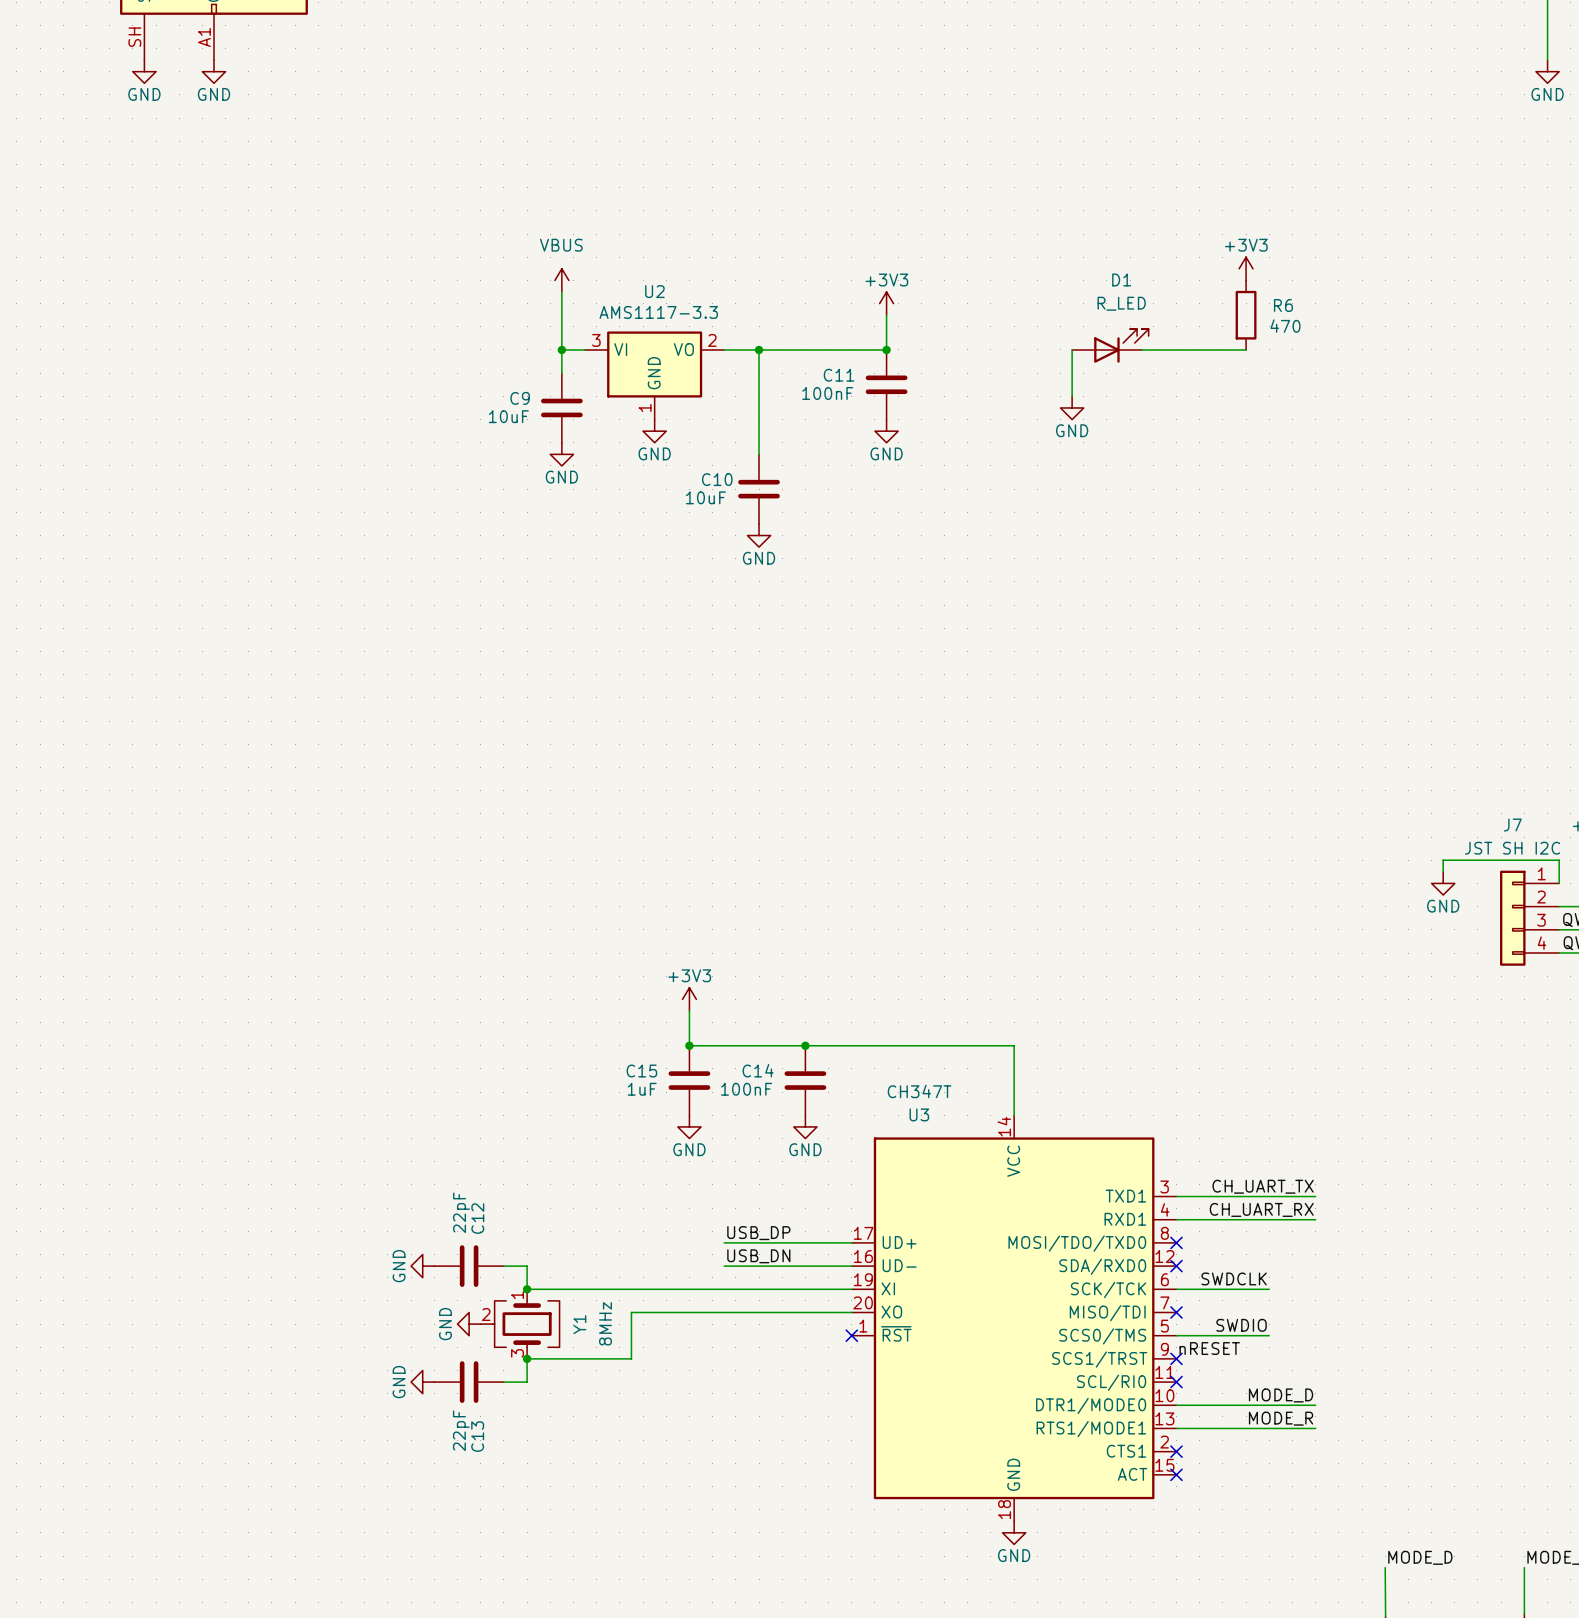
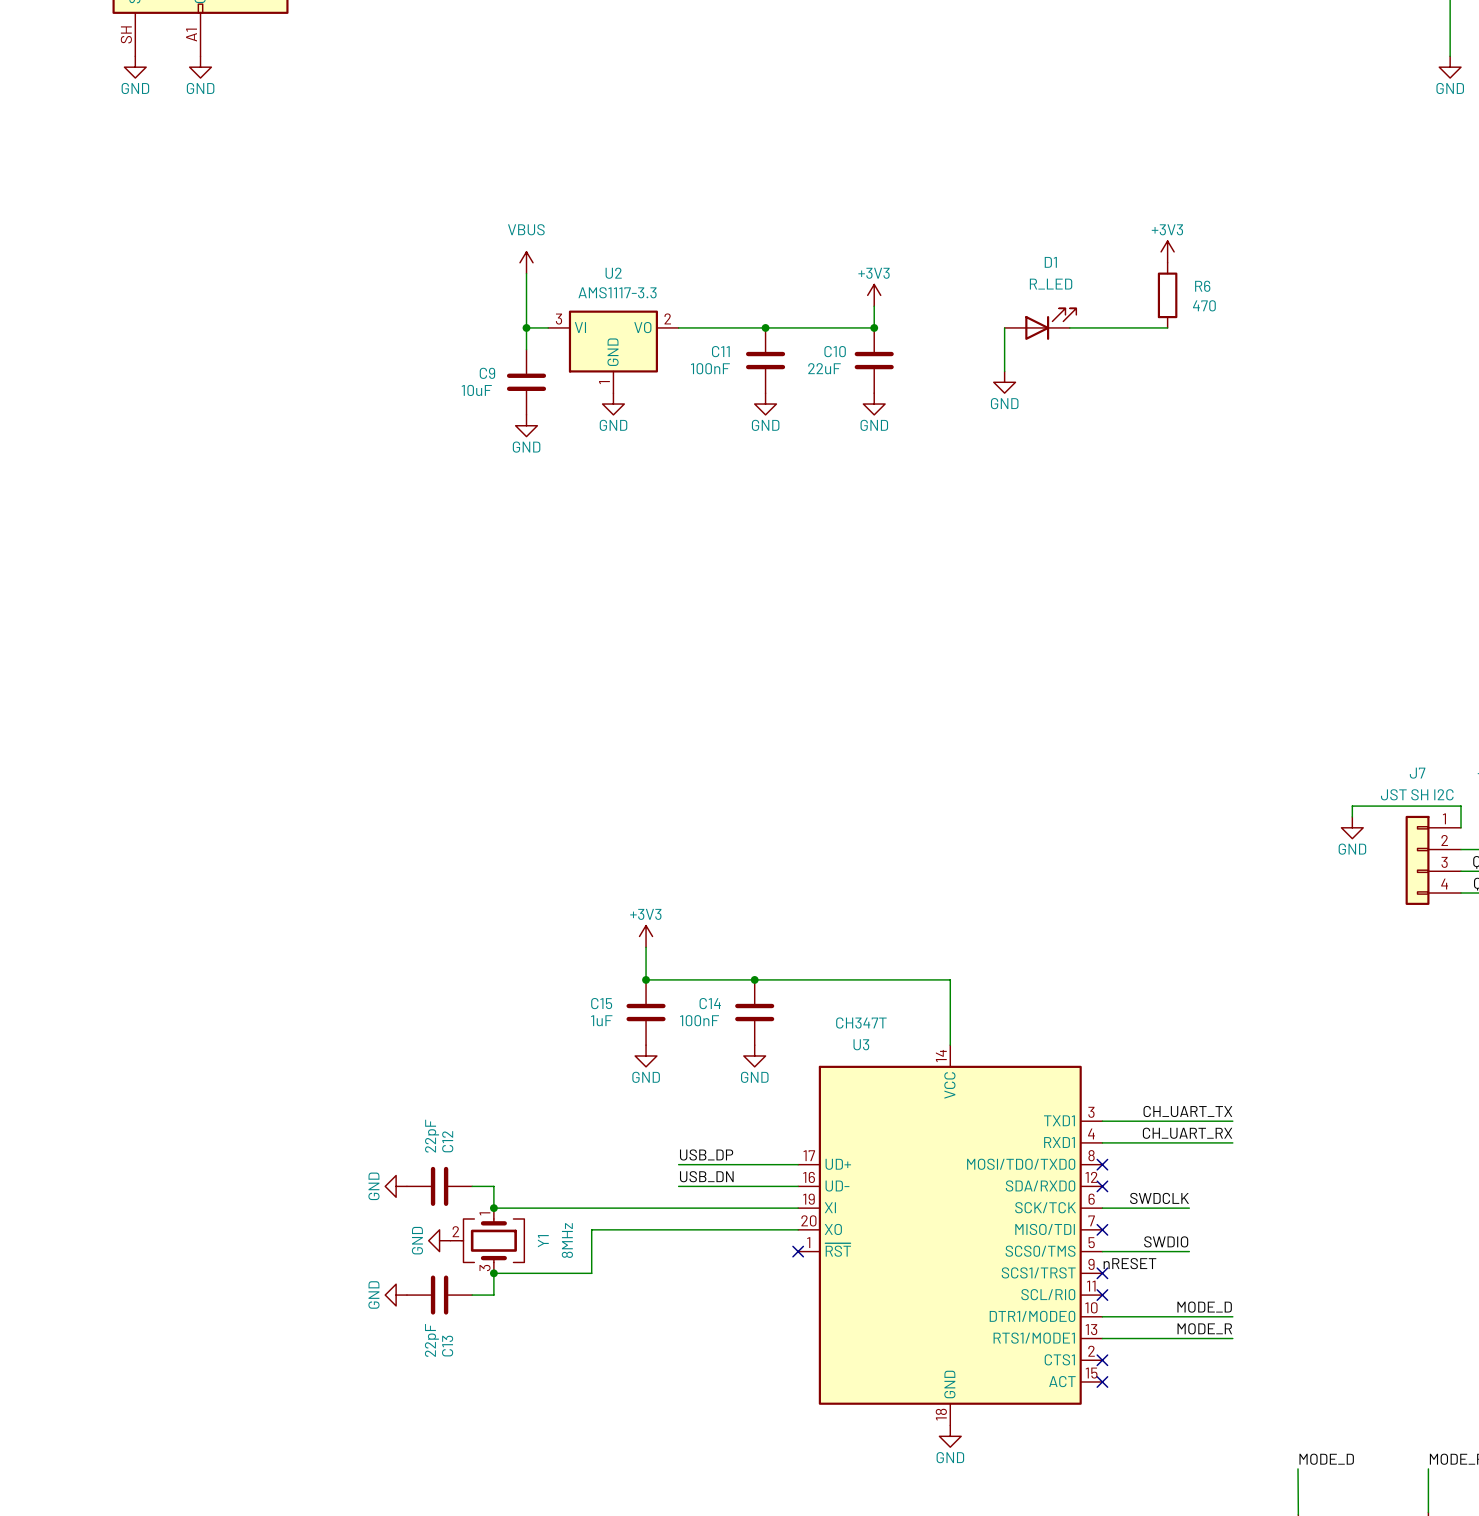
power symbol position: +3V3 (886, 303) -> +3V3 (874, 295)
wire: (886, 315) (886, 349) -> (874, 306) (874, 327) (830, 327)
wire: (759, 349) (759, 454) -> none
junction: (759, 349) -> none
junction: none -> (765, 327)
junction: (886, 349) -> none
junction: none -> (874, 327)
C11 position: (886, 384) -> (765, 360)
power symbol: none -> GND (765, 404)
power symbol: GND (886, 431) -> none
power symbol: none -> GND (874, 404)
C10 position: (759, 489) -> (874, 360)
C10 value: 10uF (705, 497) -> 22uF (824, 368)
power symbol: GND (759, 535) -> none

